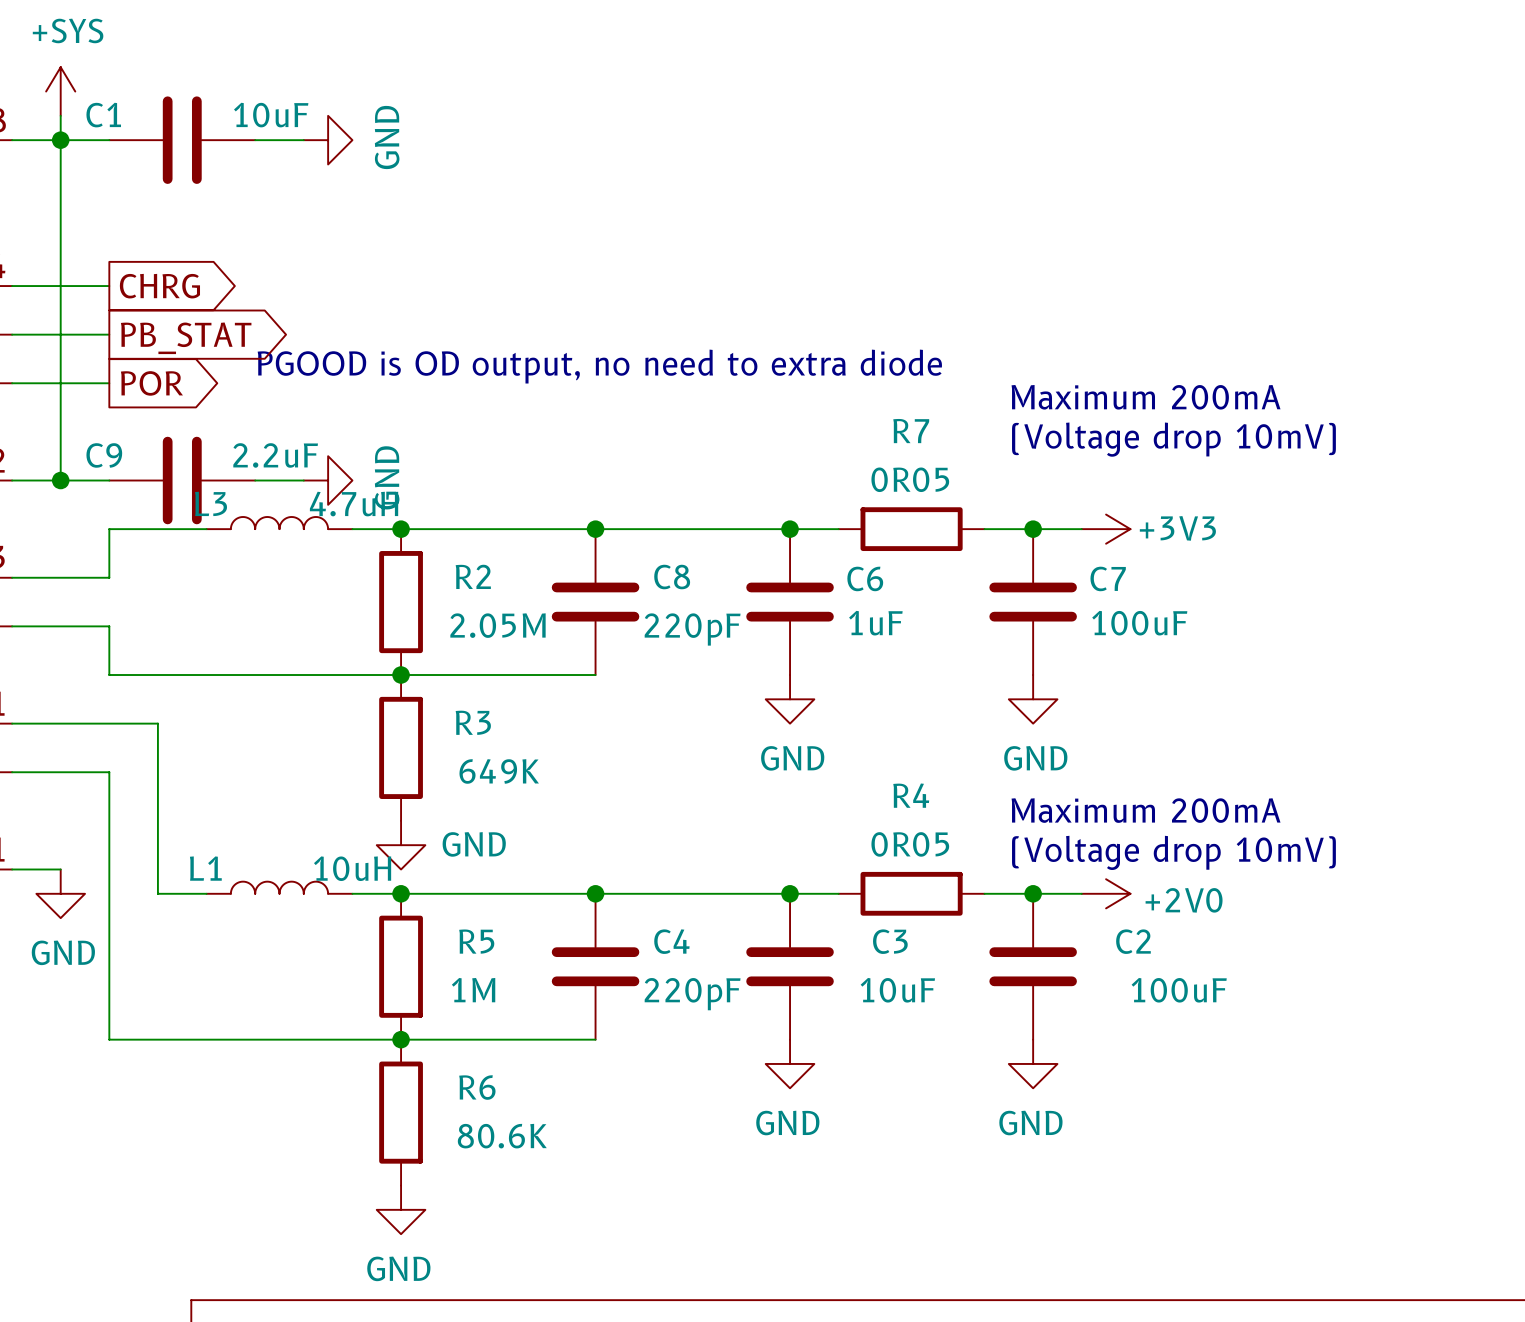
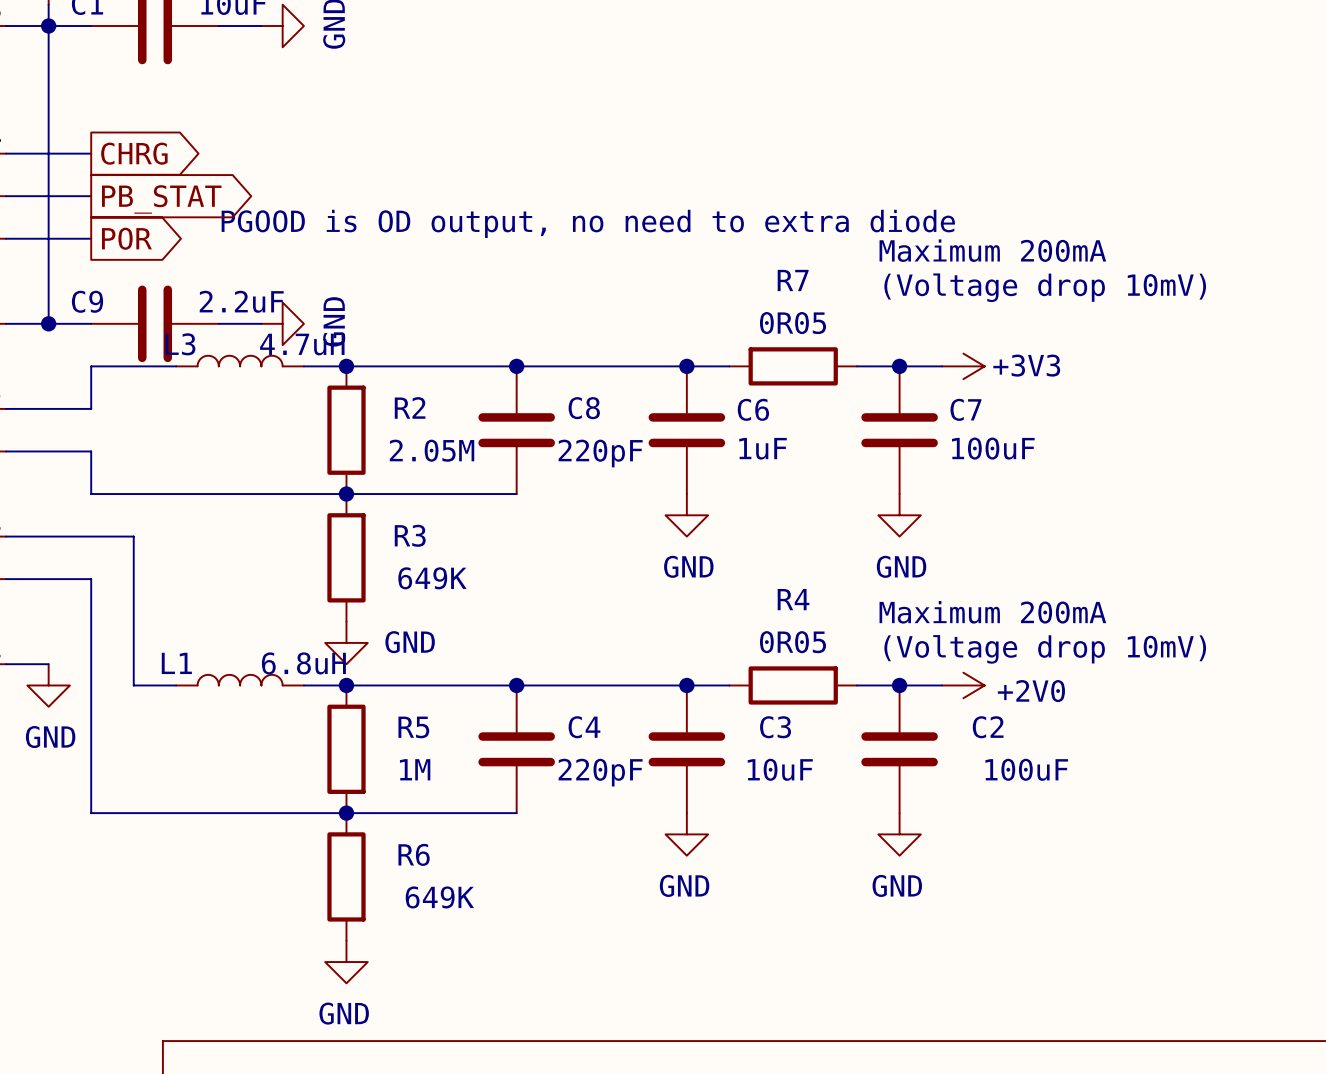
L1 value: 10uH (352, 868) -> 6.8uH (303, 663)
R6 value: 80.6K (502, 1136) -> 649K (439, 897)

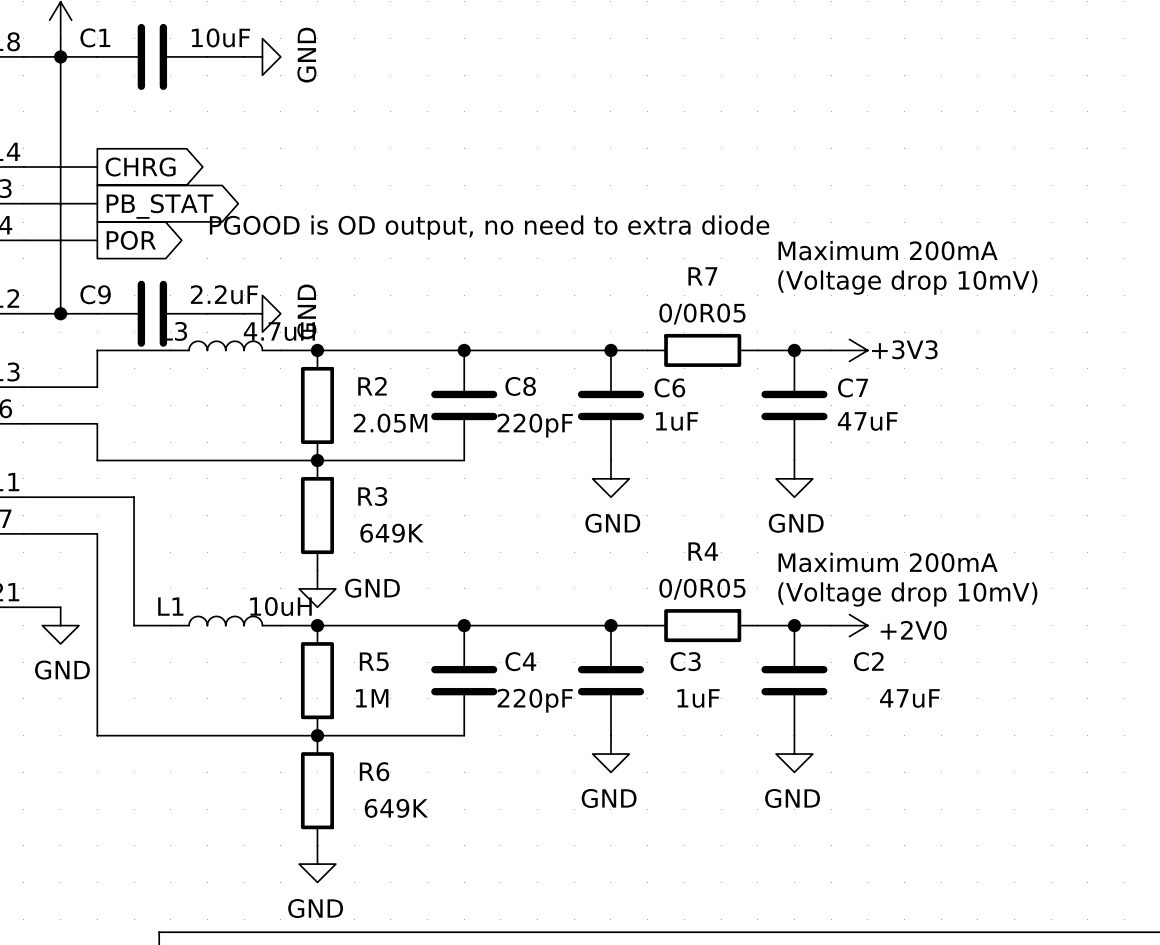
R7 value: 0R05 (793, 323) -> 0/0R05 (702, 314)
C7 value: 100uF (993, 448) -> 47uF (867, 421)
R4 value: 0R05 (793, 642) -> 0/0R05 (702, 589)
L1 value: 6.8uH (303, 663) -> 10uH (280, 606)
C3 value: 10uF (780, 769) -> 1uF (698, 698)
C2 value: 100uF (1026, 769) -> 47uF (909, 698)

